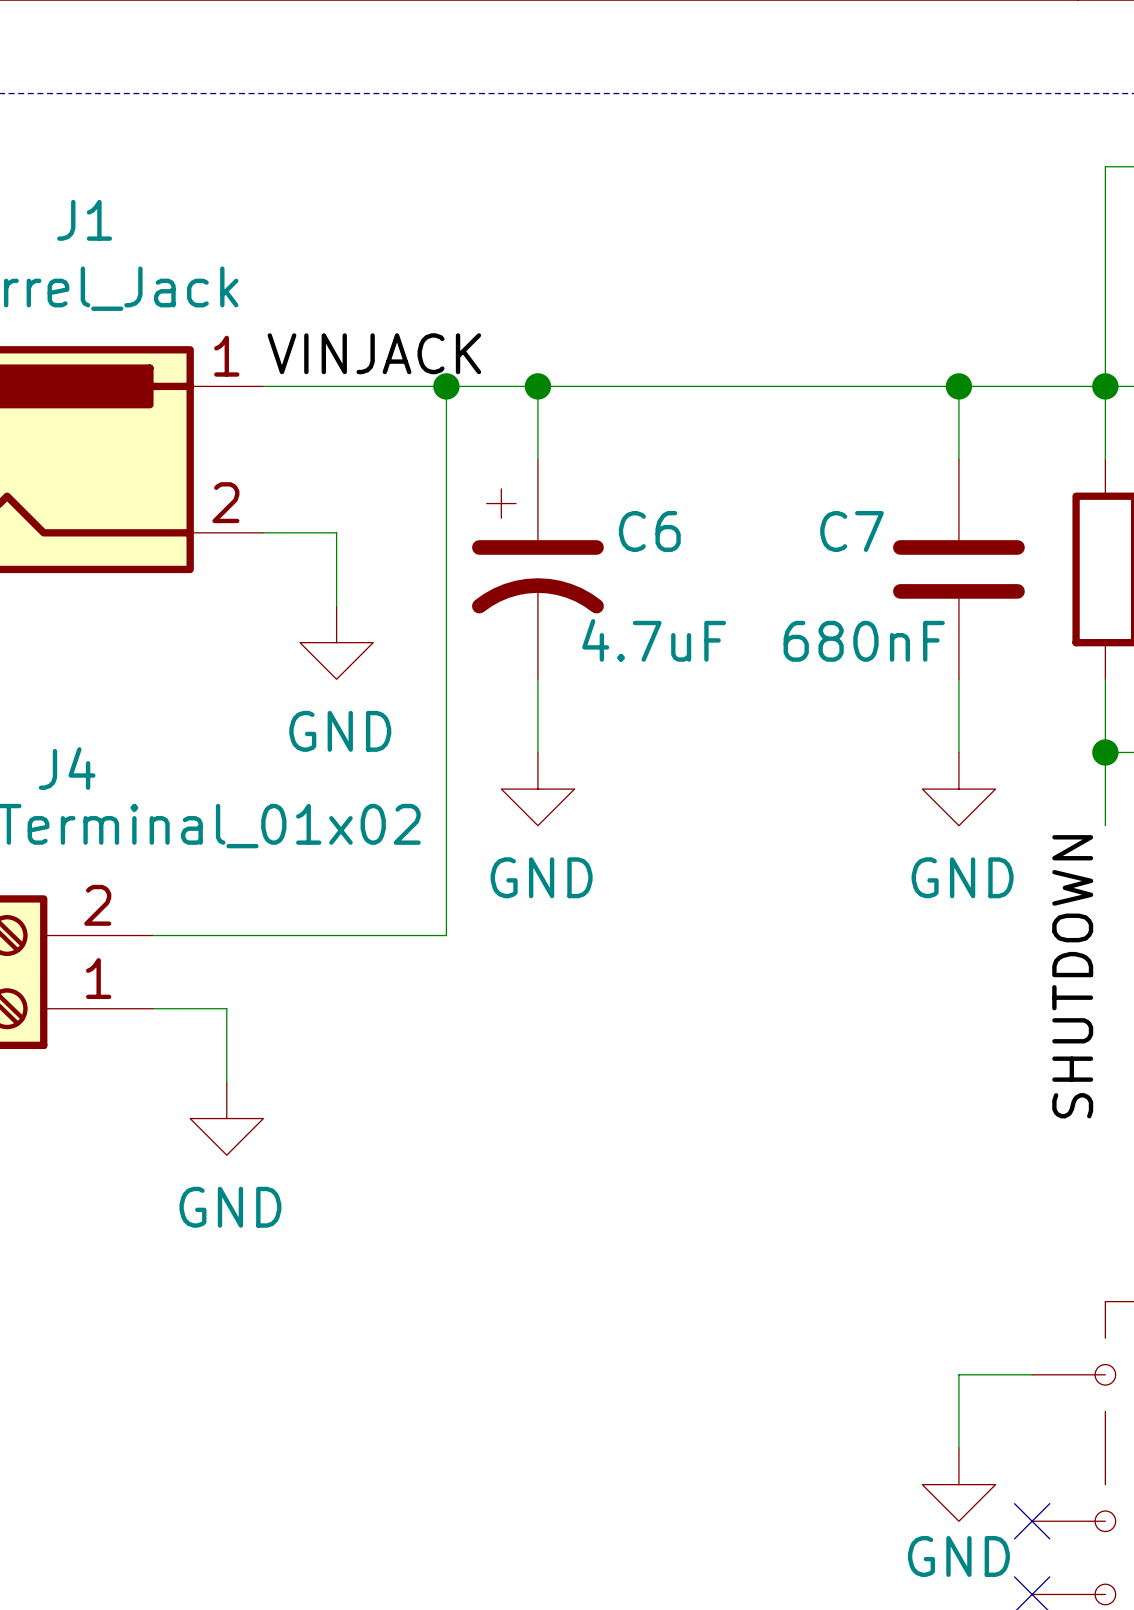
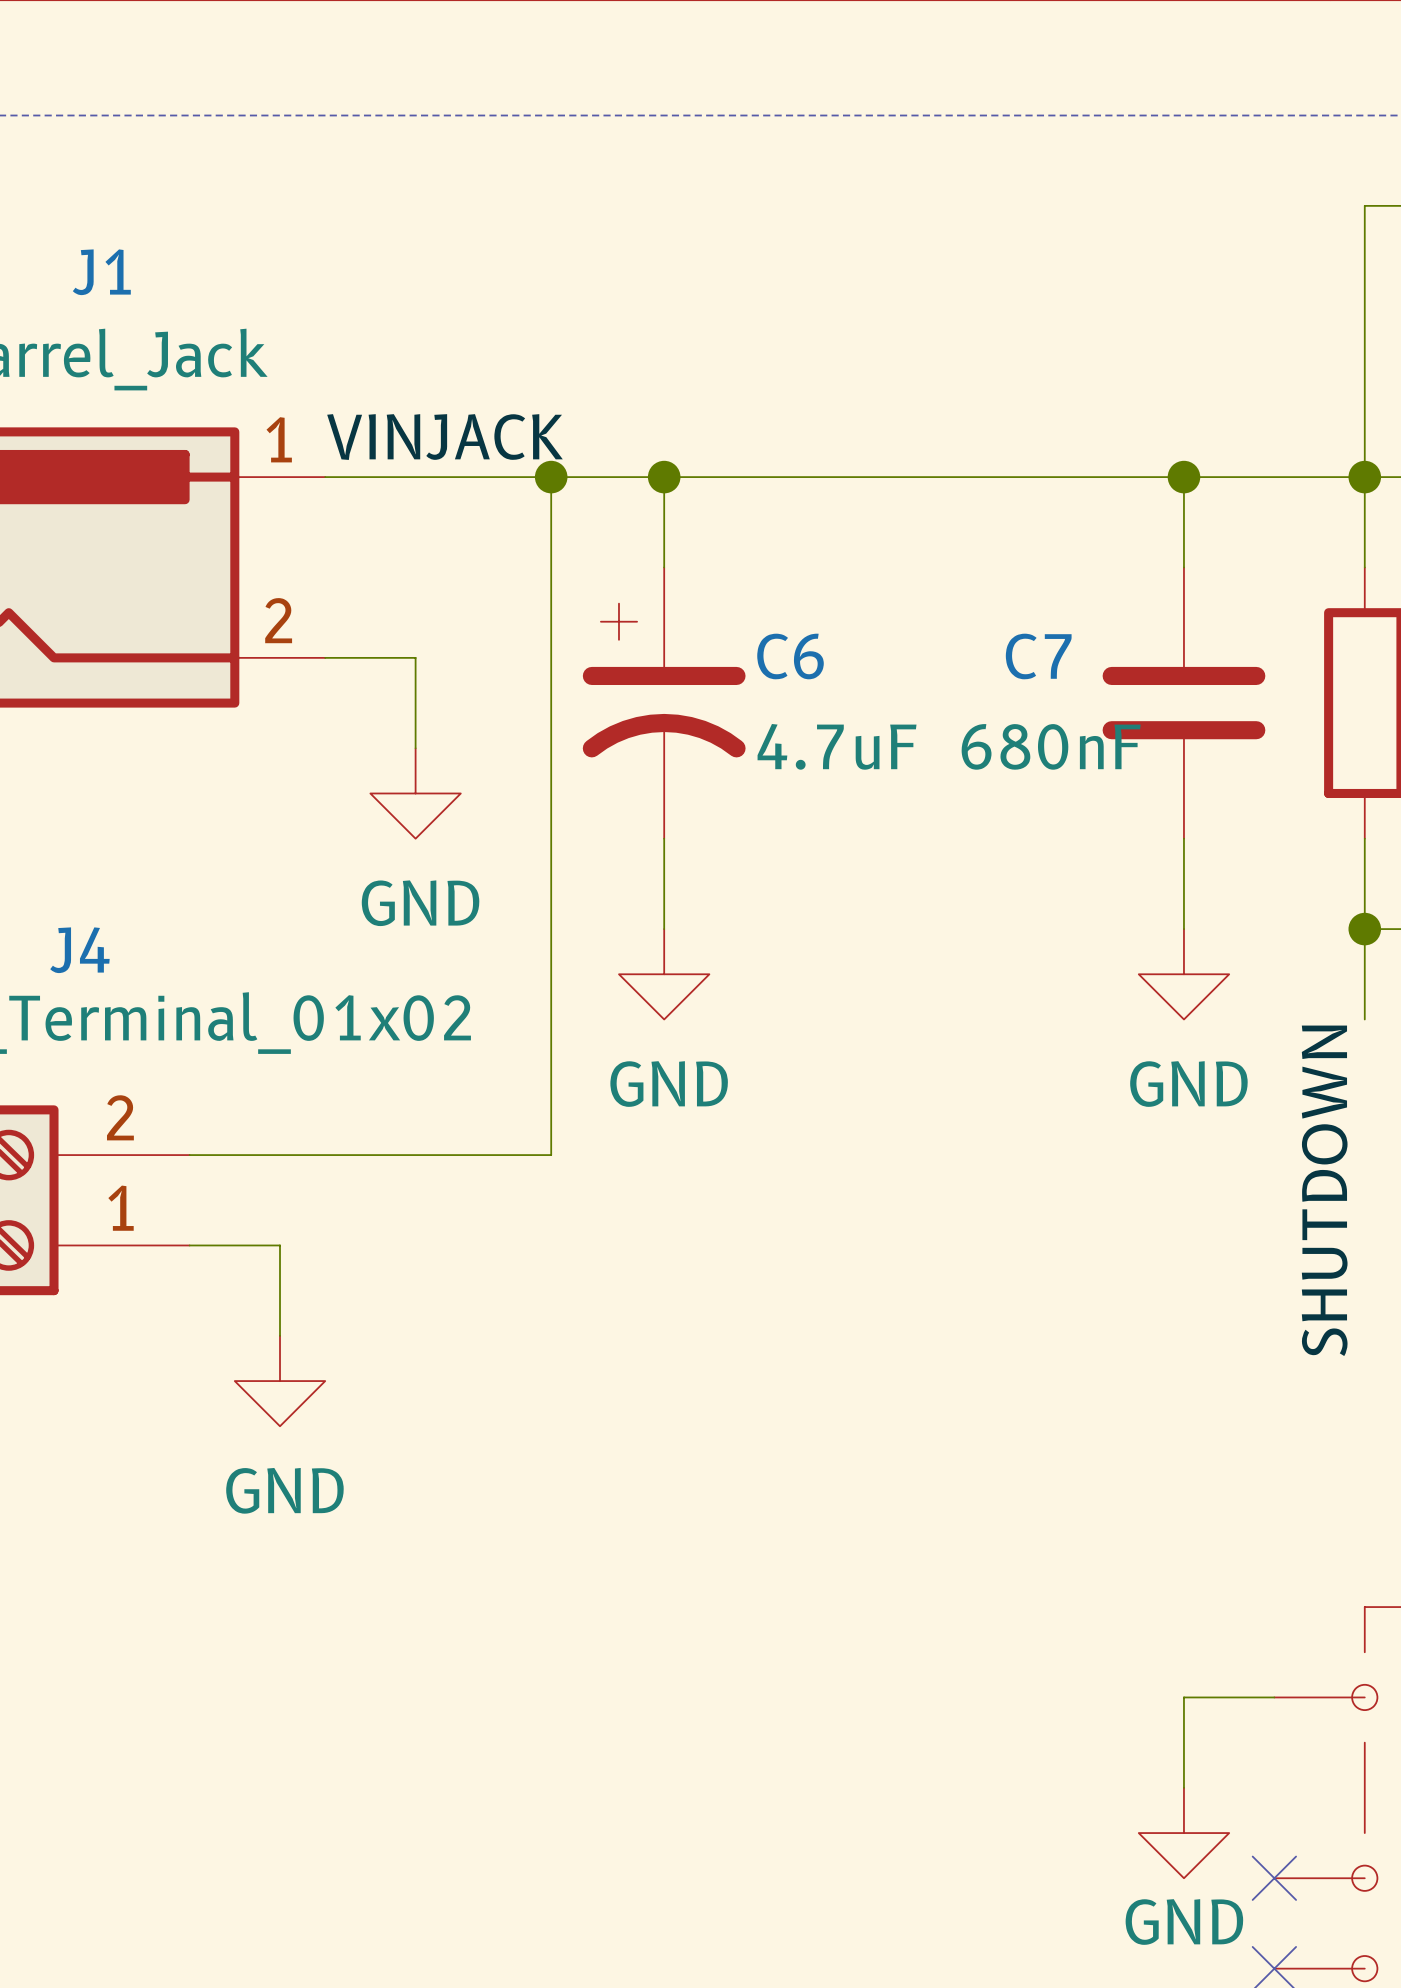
C6 value position: 4.7uF (654, 640) -> 4.7uF (837, 746)
C7 value position: 680nF (864, 641) -> 680nF (1051, 746)

